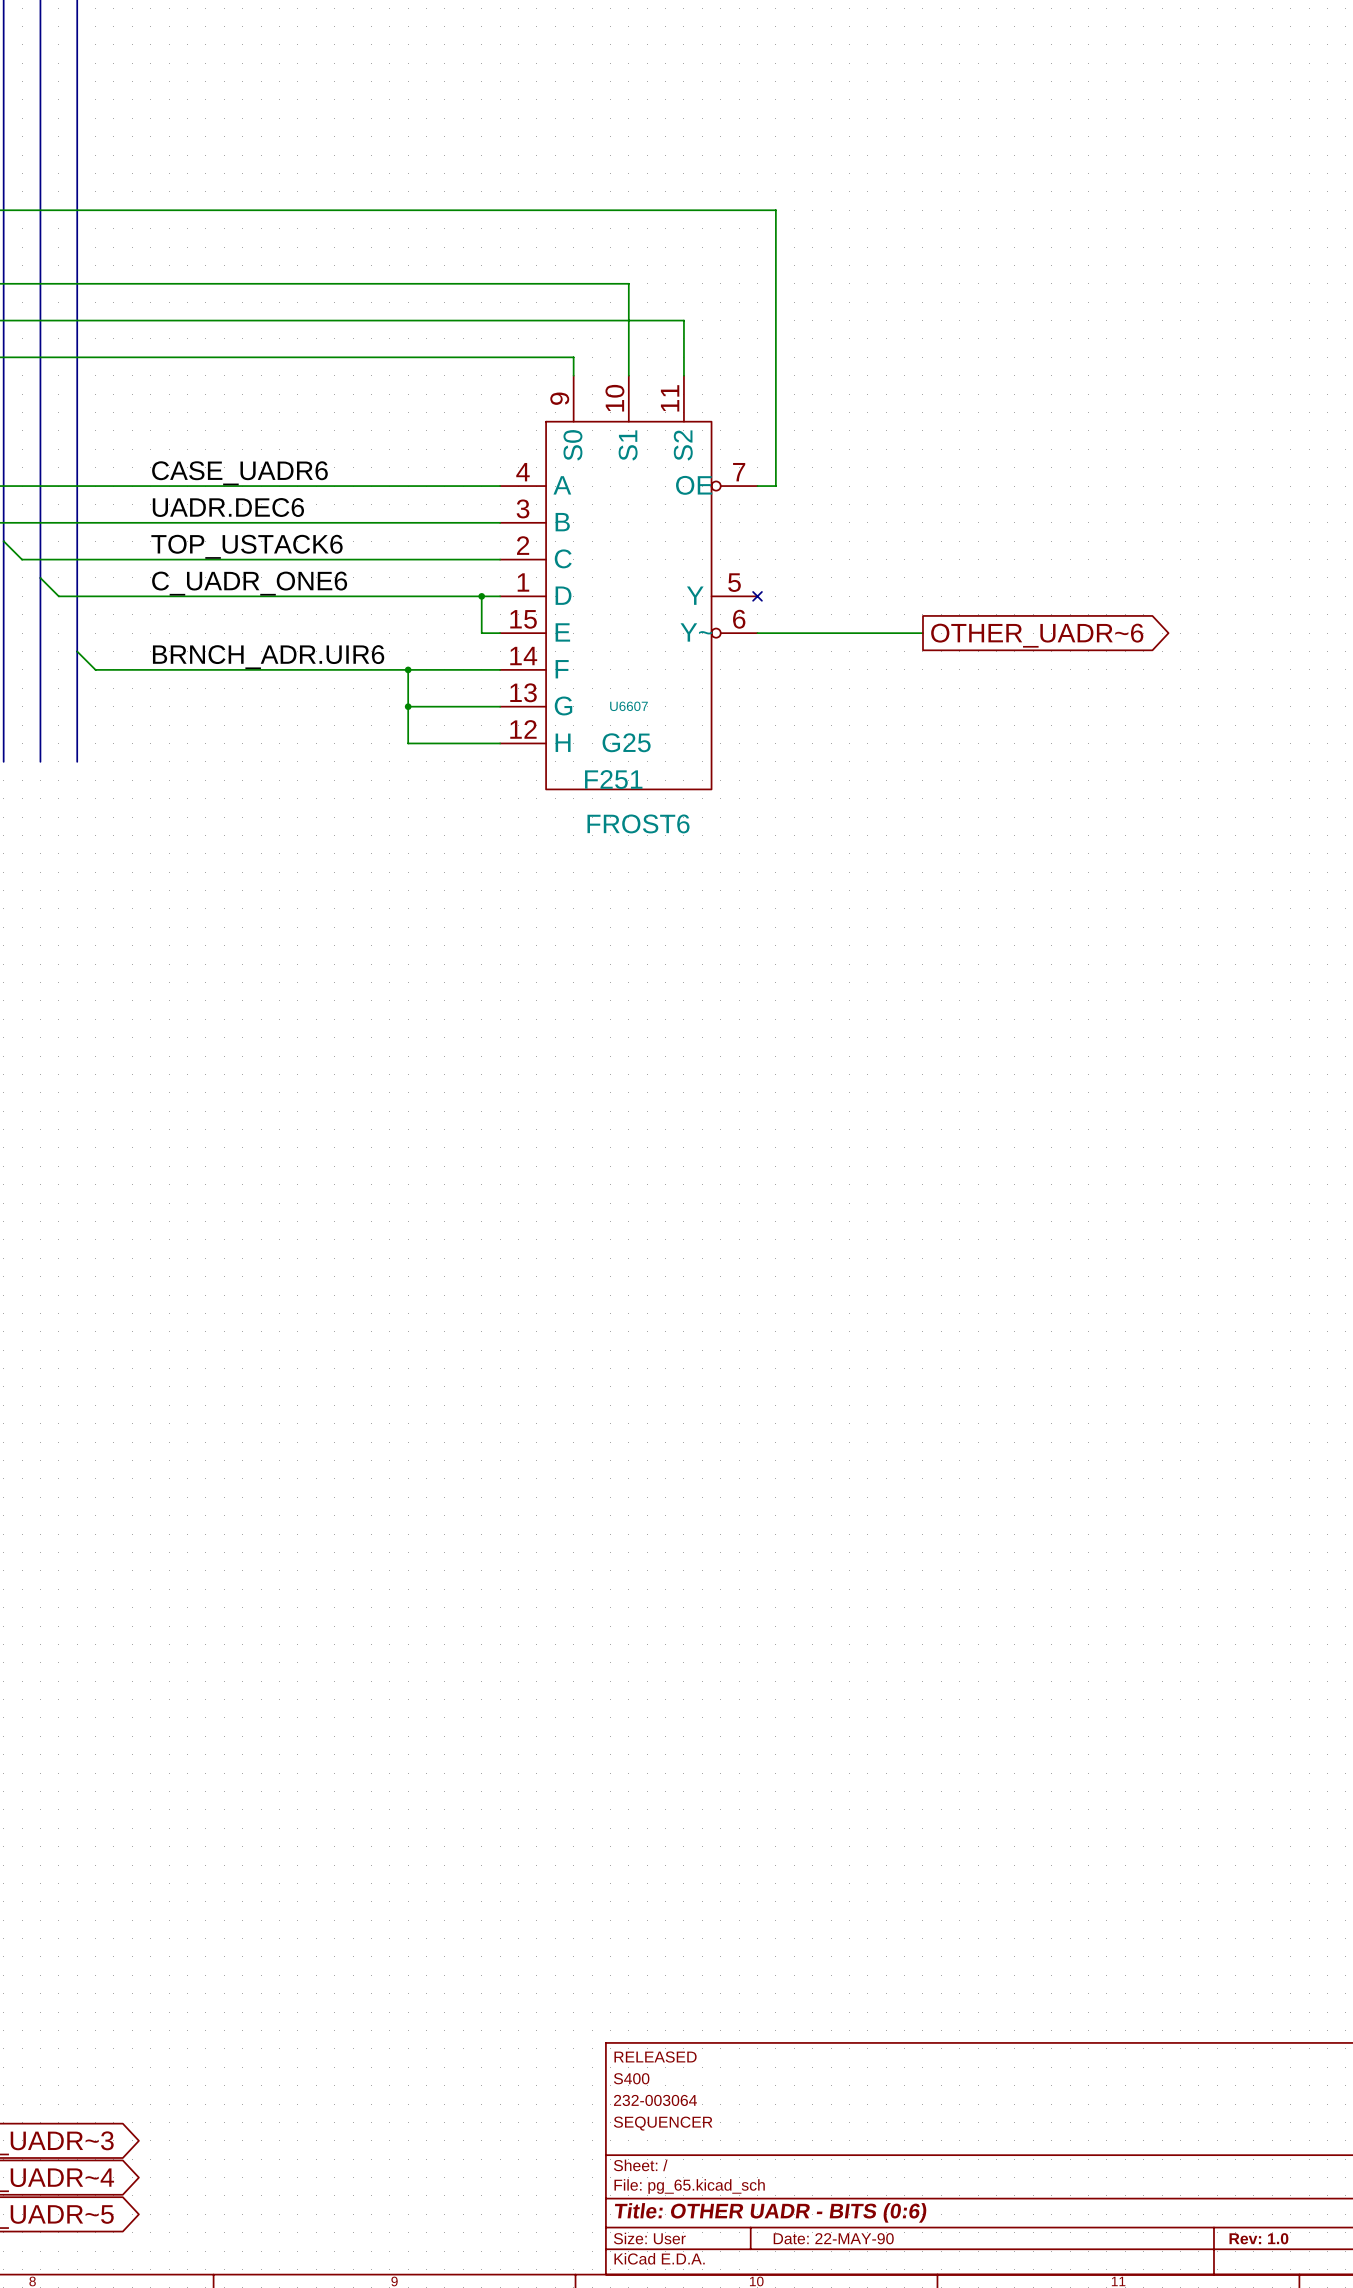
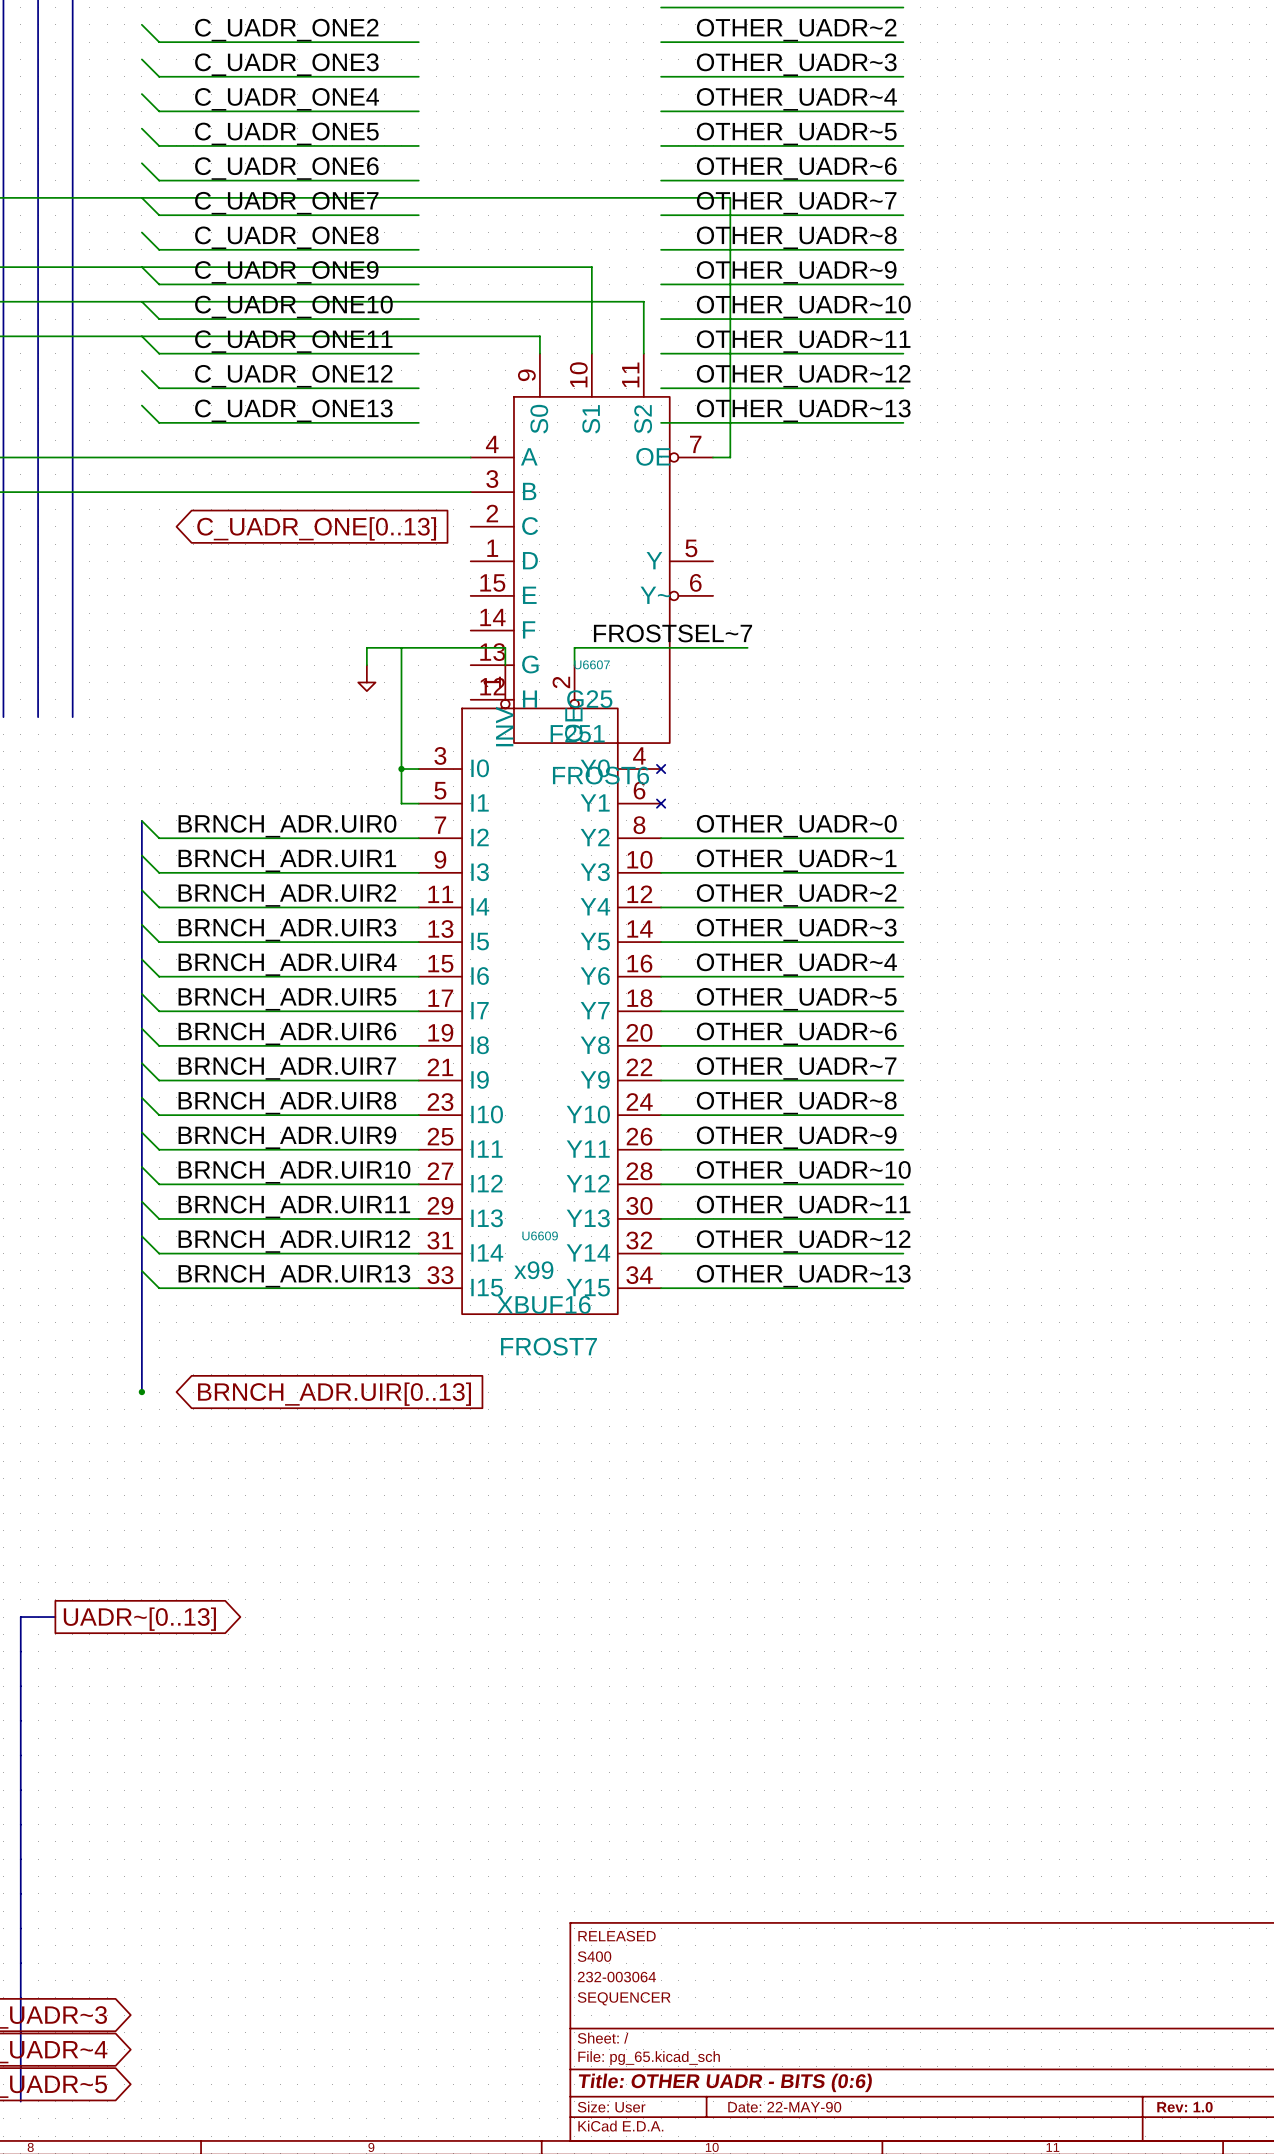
wire: none -> (661, 7) (903, 7)
wire: none -> (141, 24) (159, 42) (418, 42)
label: none -> C_UADR_ONE2 (286, 30)
label: none -> OTHER_UADR~2 (796, 30)
wire: none -> (661, 42) (903, 42)
wire: none -> (141, 59) (159, 76) (418, 76)
label: none -> C_UADR_ONE3 (286, 64)
label: none -> OTHER_UADR~3 (796, 64)
wire: none -> (661, 76) (903, 76)
wire: none -> (141, 94) (159, 111) (418, 111)
label: none -> C_UADR_ONE4 (287, 99)
label: none -> OTHER_UADR~4 (796, 99)
wire: none -> (661, 111) (903, 111)
wire: none -> (141, 128) (159, 145) (418, 145)
label: none -> C_UADR_ONE5 (286, 133)
label: none -> OTHER_UADR~5 (796, 133)
wire: none -> (661, 145) (903, 145)
wire: none -> (141, 163) (159, 180) (418, 180)
label: none -> C_UADR_ONE6 (286, 168)
label: none -> OTHER_UADR~6 (796, 168)
wire: none -> (661, 180) (903, 180)
wire: none -> (141, 197) (159, 215) (418, 215)
label: none -> C_UADR_ONE7 (286, 203)
label: none -> OTHER_UADR~7 (796, 203)
wire: none -> (661, 215) (903, 215)
wire: none -> (141, 232) (159, 249) (418, 249)
label: none -> C_UADR_ONE8 (286, 237)
label: none -> OTHER_UADR~8 (796, 237)
wire: none -> (661, 249) (903, 249)
wire: none -> (141, 267) (159, 284) (418, 284)
label: none -> C_UADR_ONE9 (286, 272)
label: none -> OTHER_UADR~9 (796, 272)
wire: none -> (661, 284) (903, 284)
wire: none -> (141, 301) (159, 319) (418, 319)
label: none -> C_UADR_ONE10 (293, 307)
label: none -> OTHER_UADR~10 (803, 307)
wire: none -> (661, 319) (903, 319)
wire: none -> (141, 336) (159, 353) (418, 353)
label: none -> C_UADR_ONE11 (293, 341)
label: none -> OTHER_UADR~11 (803, 341)
wire: none -> (661, 353) (903, 353)
wire: none -> (141, 370) (159, 388) (418, 388)
label: none -> C_UADR_ONE12 (293, 376)
label: none -> OTHER_UADR~12 (803, 376)
wire: none -> (661, 388) (903, 388)
wire: none -> (141, 405) (159, 422) (418, 422)
label: none -> C_UADR_ONE13 (293, 410)
label: none -> OTHER_UADR~13 (803, 410)
wire: none -> (661, 422) (903, 422)
label: CASE_UADR6 (239, 473) -> none
label: UADR.DEC6 (228, 507) -> none
wire: (3, 541) (22, 559) (500, 559) -> none
label: TOP_USTACK6 (247, 546) -> none
global label: none -> C_UADR_ONE[0..13] (316, 528)
wire: (40, 577) (58, 596) (500, 596) -> none
label: C_UADR_ONE6 (249, 583) -> none
wire: (481, 596) (481, 633) (500, 633) -> none
junction: (481, 596) -> none
no-connect mark: (757, 596) -> none
wire: (757, 633) (922, 633) -> none
global label: OTHER_UADR~6 (1037, 635) -> none
wire: (77, 651) (95, 669) (500, 669) -> none
label: BRNCH_ADR.UIR6 (268, 657) -> none
wire: (408, 669) (408, 743) (500, 743) -> none
junction: (408, 669) -> none
label: none -> FROSTSEL~7 (673, 633)
wire: none -> (401, 647) (401, 803) (418, 803)
wire: none -> (747, 647) (574, 647) (574, 665)
wire: none -> (366, 665) (366, 647) (505, 647) (505, 665)
wire: (408, 706) (500, 706) -> none
junction: (408, 706) -> none
power symbol: none -> (366, 678)
wire: none -> (401, 769) (418, 769)
junction: none -> (401, 769)
no-connect mark: none -> (661, 769)
no-connect mark: none -> (661, 803)
bus: none -> (141, 820) (141, 1392)
wire: none -> (141, 820) (159, 838) (418, 838)
label: none -> BRNCH_ADR.UIR0 (287, 826)
label: none -> OTHER_UADR~0 (796, 826)
wire: none -> (661, 838) (903, 838)
wire: none -> (141, 855) (159, 872) (418, 872)
label: none -> BRNCH_ADR.UIR1 (287, 860)
label: none -> OTHER_UADR~1 (796, 860)
wire: none -> (661, 872) (903, 872)
wire: none -> (141, 890) (159, 907) (418, 907)
label: none -> BRNCH_ADR.UIR2 (287, 895)
label: none -> OTHER_UADR~2 (796, 895)
wire: none -> (661, 907) (903, 907)
wire: none -> (141, 924) (159, 942) (418, 942)
label: none -> BRNCH_ADR.UIR3 (287, 930)
label: none -> OTHER_UADR~3 (796, 930)
wire: none -> (661, 942) (903, 942)
wire: none -> (141, 959) (159, 976) (418, 976)
label: none -> BRNCH_ADR.UIR4 (287, 964)
label: none -> OTHER_UADR~4 (796, 964)
wire: none -> (661, 976) (903, 976)
U6609: none -> XBUF16 (539, 989)
wire: none -> (141, 993) (159, 1011) (418, 1011)
label: none -> BRNCH_ADR.UIR5 (287, 999)
label: none -> OTHER_UADR~5 (796, 999)
wire: none -> (661, 1011) (903, 1011)
wire: none -> (141, 1028) (159, 1045) (418, 1045)
label: none -> BRNCH_ADR.UIR6 (287, 1033)
label: none -> OTHER_UADR~6 (796, 1033)
wire: none -> (661, 1045) (903, 1045)
wire: none -> (141, 1063) (159, 1080) (418, 1080)
label: none -> BRNCH_ADR.UIR7 (287, 1068)
label: none -> OTHER_UADR~7 (796, 1068)
wire: none -> (661, 1080) (903, 1080)
wire: none -> (141, 1097) (159, 1115) (418, 1115)
label: none -> BRNCH_ADR.UIR8 (287, 1103)
label: none -> OTHER_UADR~8 (796, 1103)
wire: none -> (661, 1115) (903, 1115)
wire: none -> (141, 1132) (159, 1149) (418, 1149)
label: none -> BRNCH_ADR.UIR9 (287, 1137)
label: none -> OTHER_UADR~9 (796, 1137)
wire: none -> (661, 1149) (903, 1149)
wire: none -> (141, 1167) (159, 1184) (418, 1184)
label: none -> BRNCH_ADR.UIR10 (294, 1172)
label: none -> OTHER_UADR~10 (803, 1172)
wire: none -> (661, 1184) (903, 1184)
wire: none -> (141, 1201) (159, 1218) (418, 1218)
label: none -> BRNCH_ADR.UIR11 (294, 1206)
label: none -> OTHER_UADR~11 (803, 1206)
wire: none -> (661, 1218) (903, 1218)
wire: none -> (141, 1236) (159, 1253) (418, 1253)
label: none -> BRNCH_ADR.UIR12 (294, 1241)
label: none -> OTHER_UADR~12 (803, 1241)
wire: none -> (661, 1253) (903, 1253)
wire: none -> (141, 1270) (159, 1288) (418, 1288)
label: none -> BRNCH_ADR.UIR13 (294, 1276)
label: none -> OTHER_UADR~13 (803, 1276)
wire: none -> (661, 1288) (903, 1288)
junction: none -> (141, 1392)
global label: none -> BRNCH_ADR.UIR[0..13] (334, 1394)
bus: none -> (55, 1617) (20, 1617) (20, 2101)
global label: none -> UADR~[0..13] (139, 1619)

